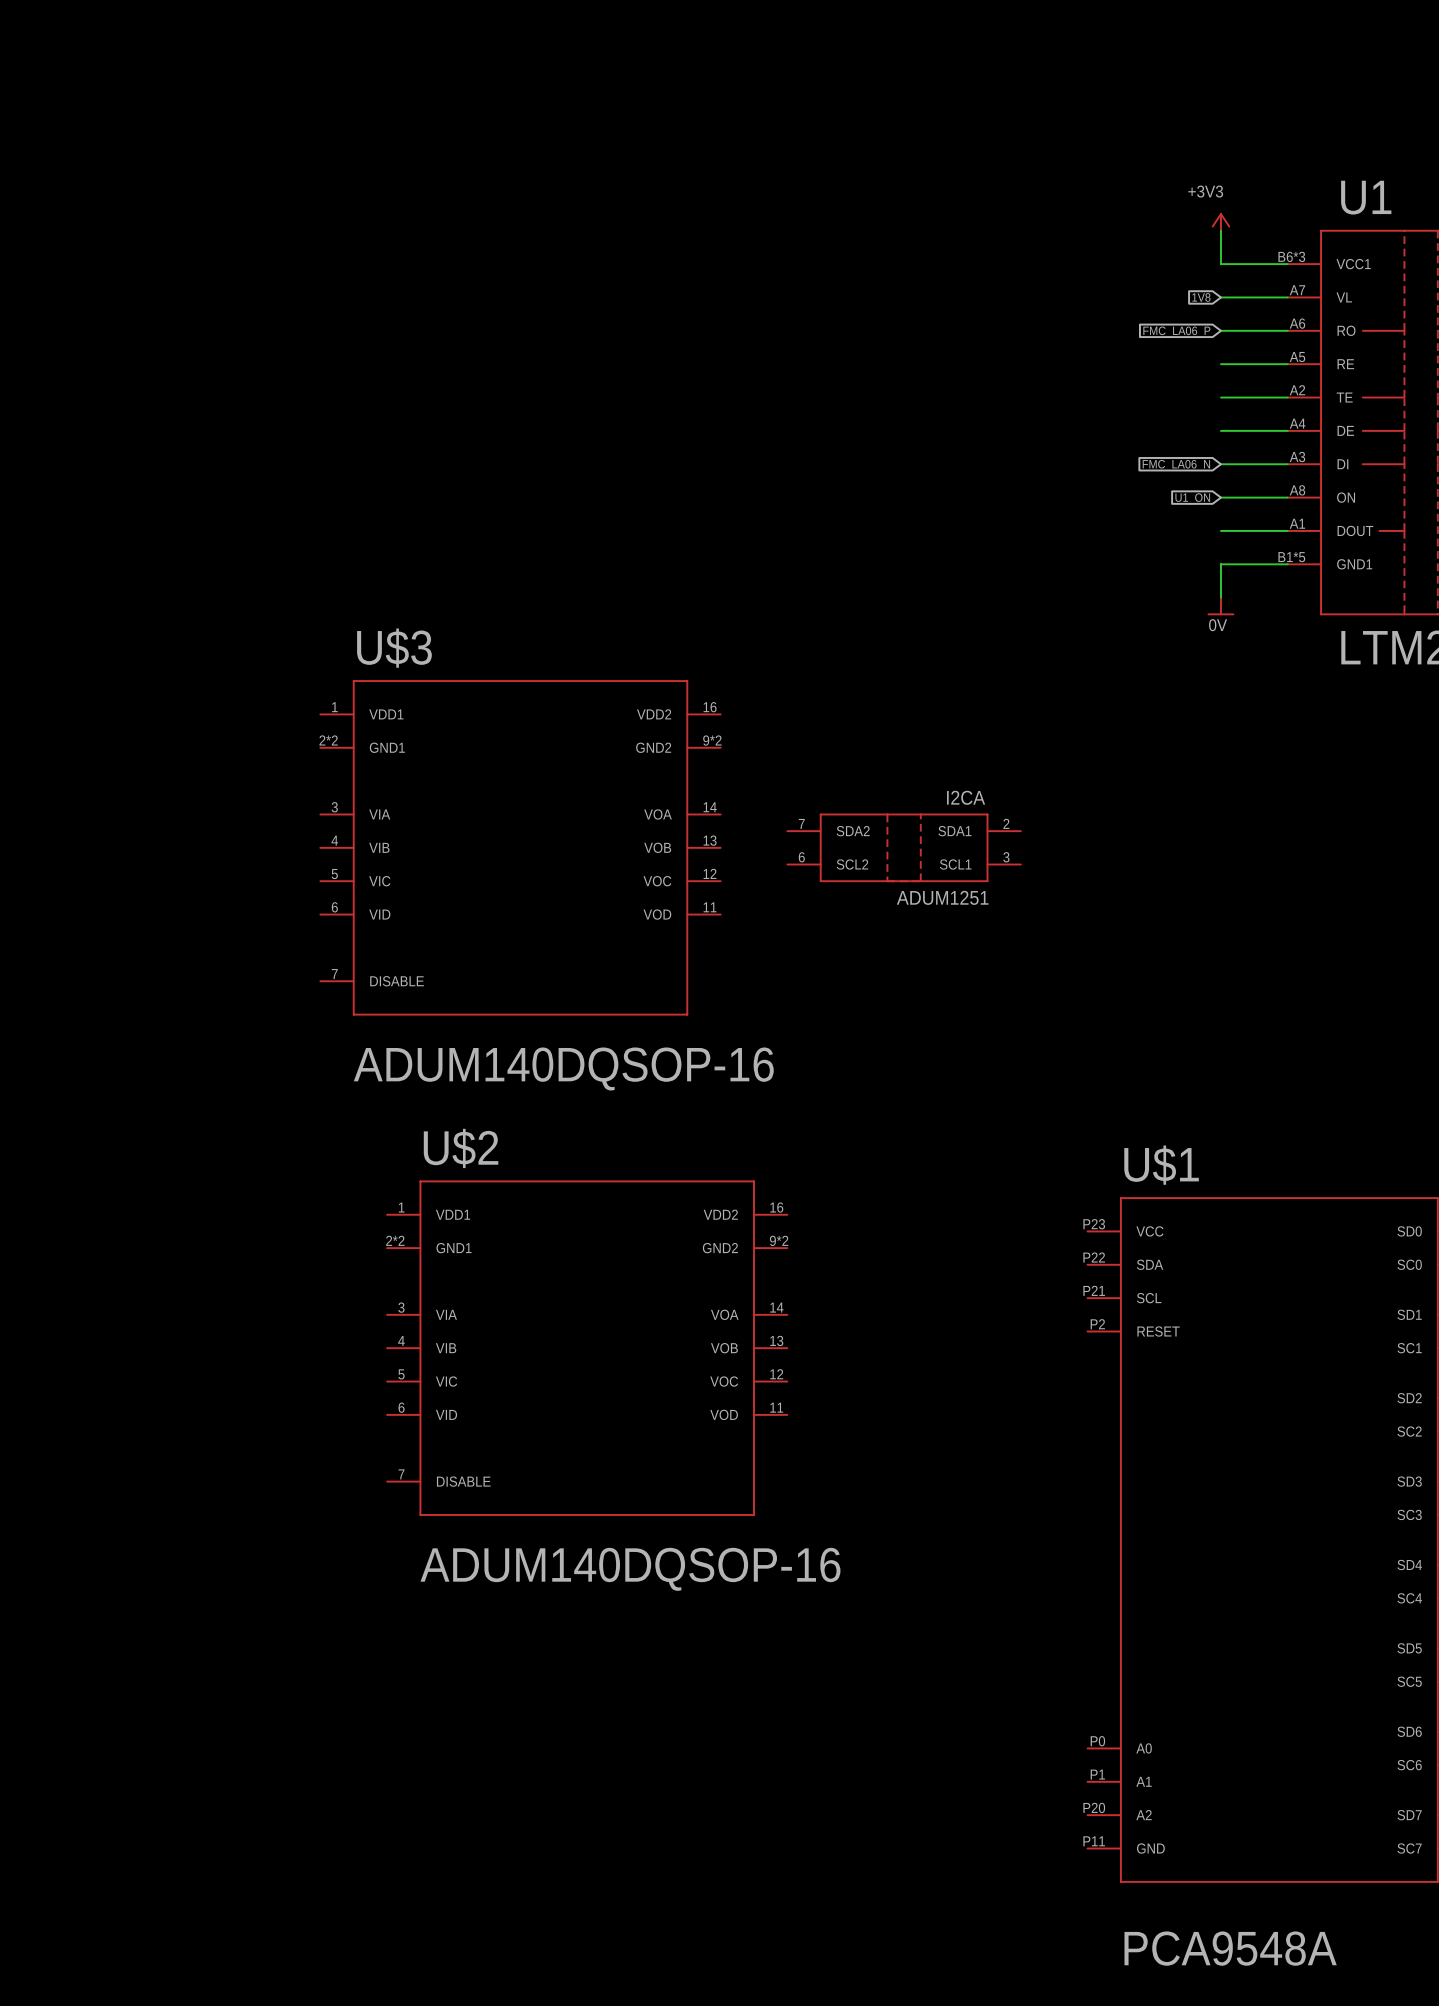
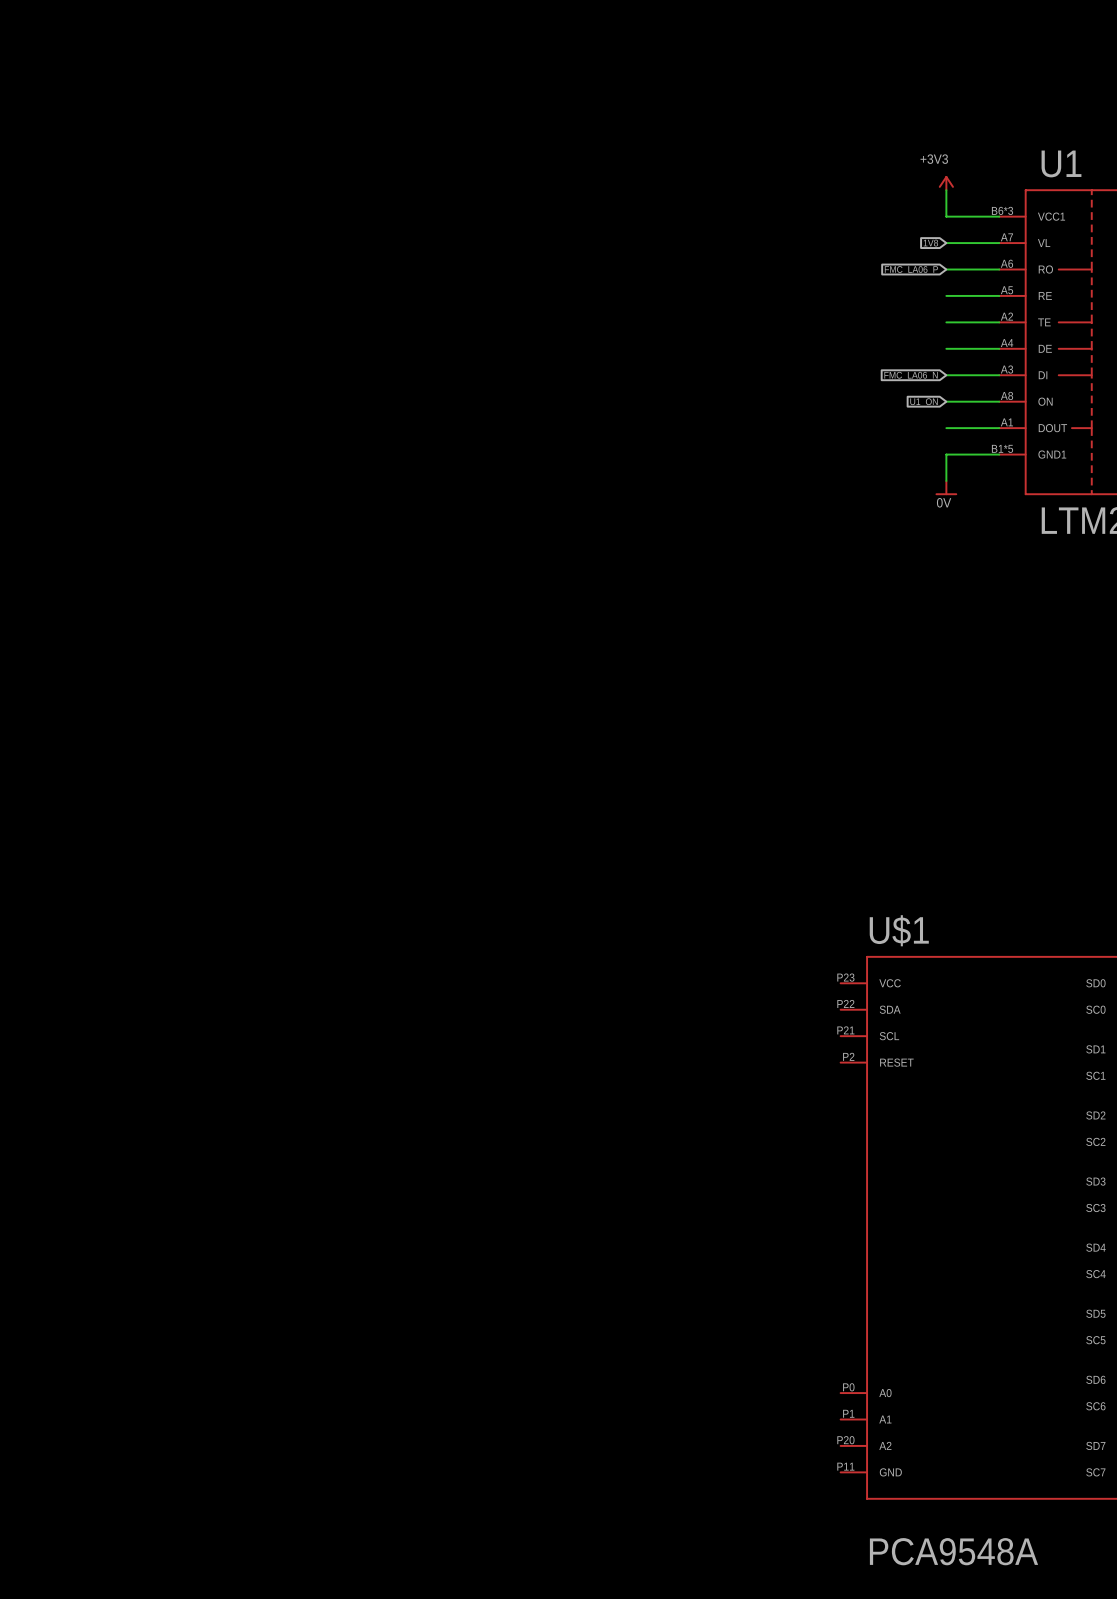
U$3: ADUM140DQSOP-16 (520, 847) -> none
I2CA: ADUM1251 (904, 847) -> none
U$2: ADUM140DQSOP-16 (587, 1348) -> none

